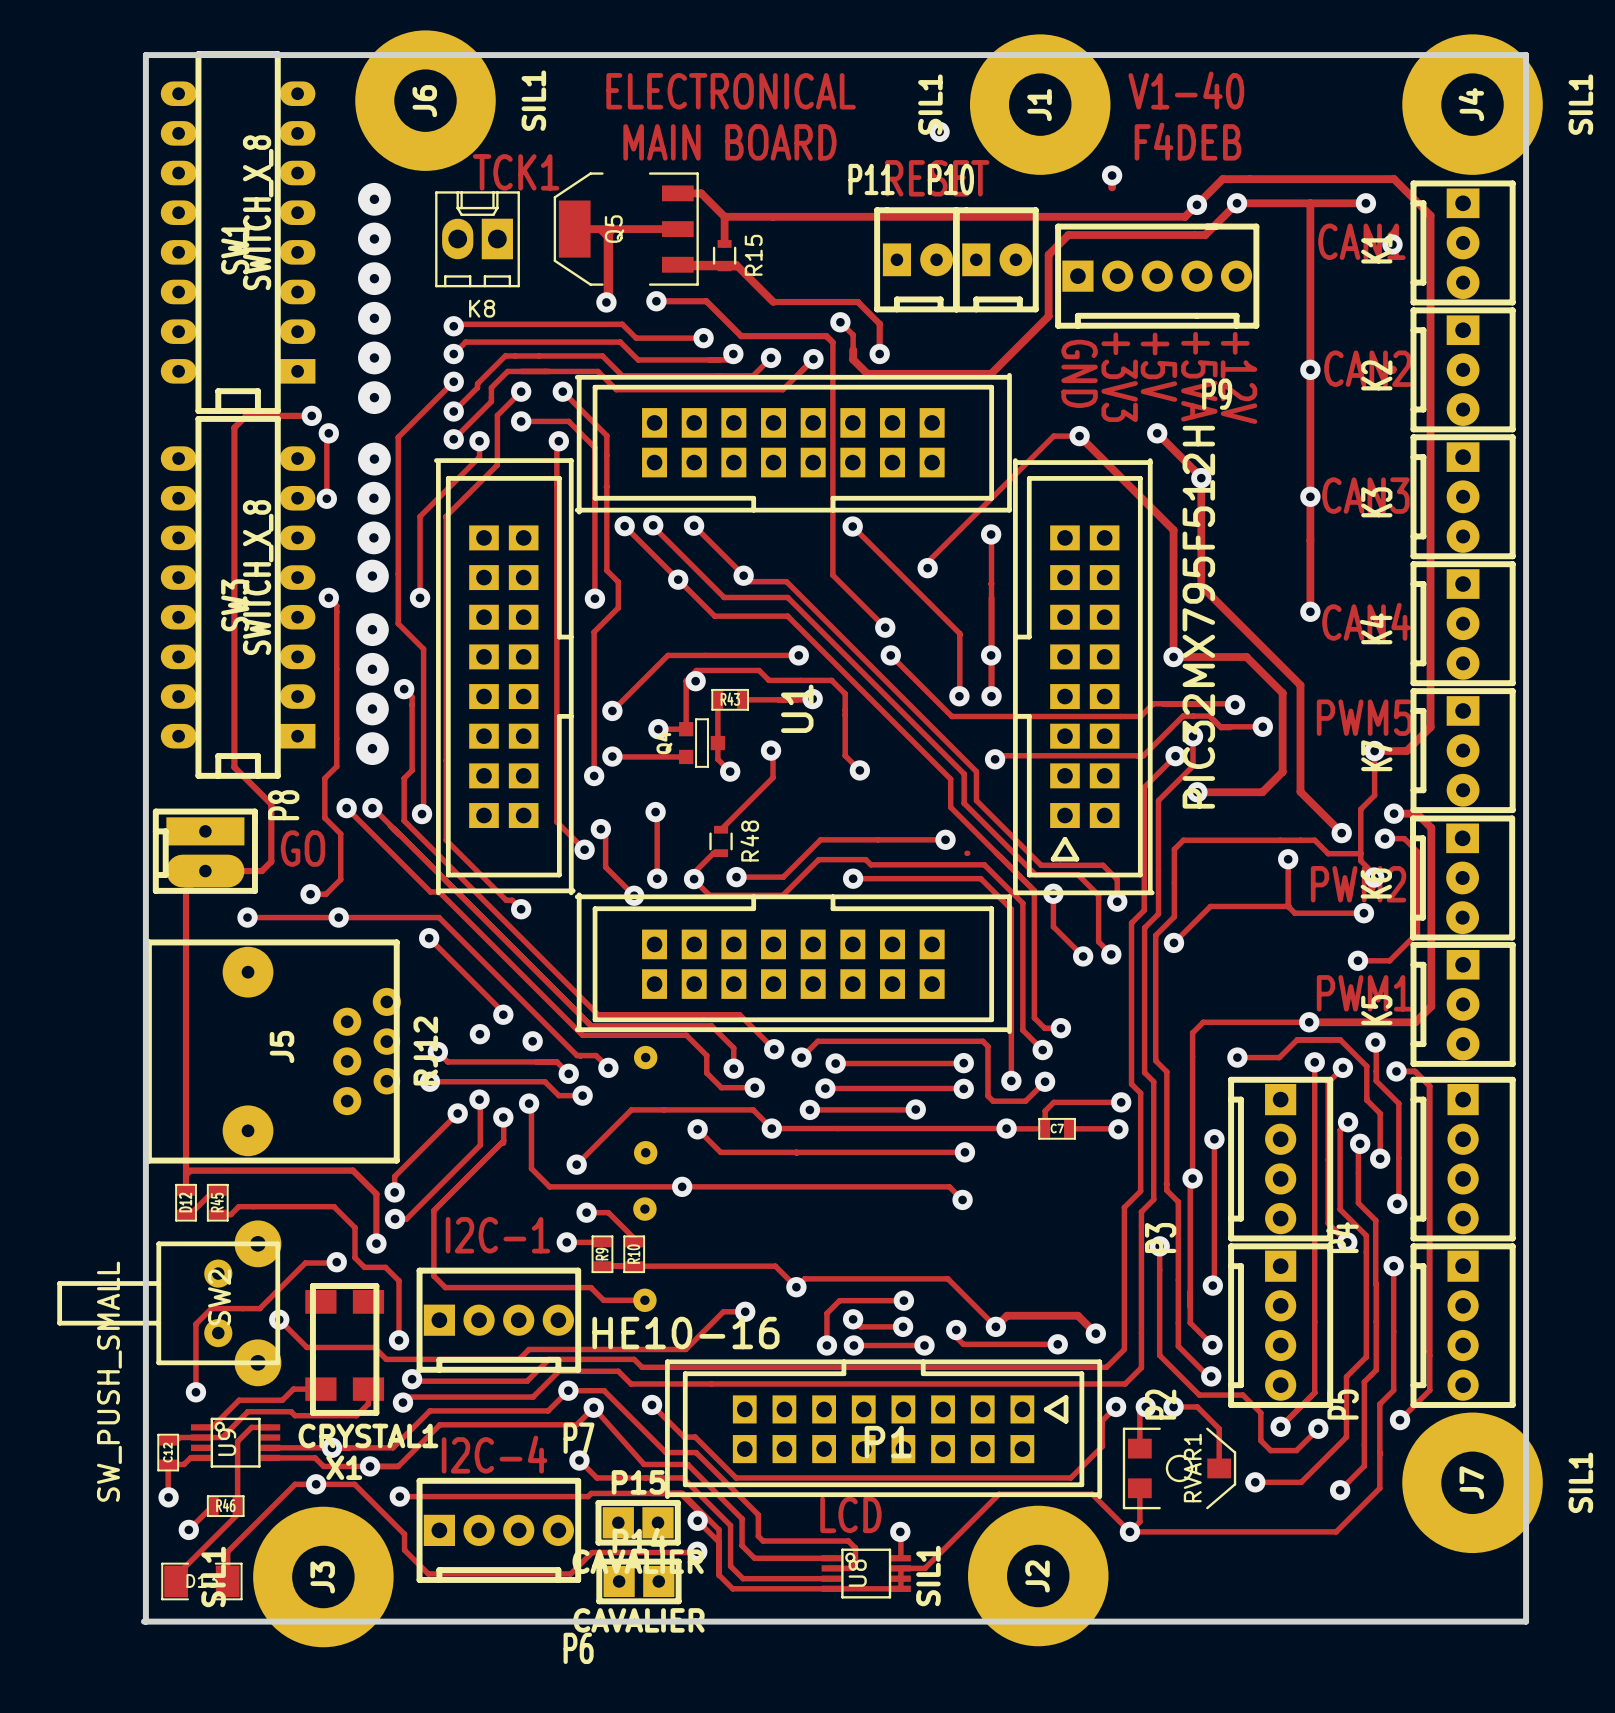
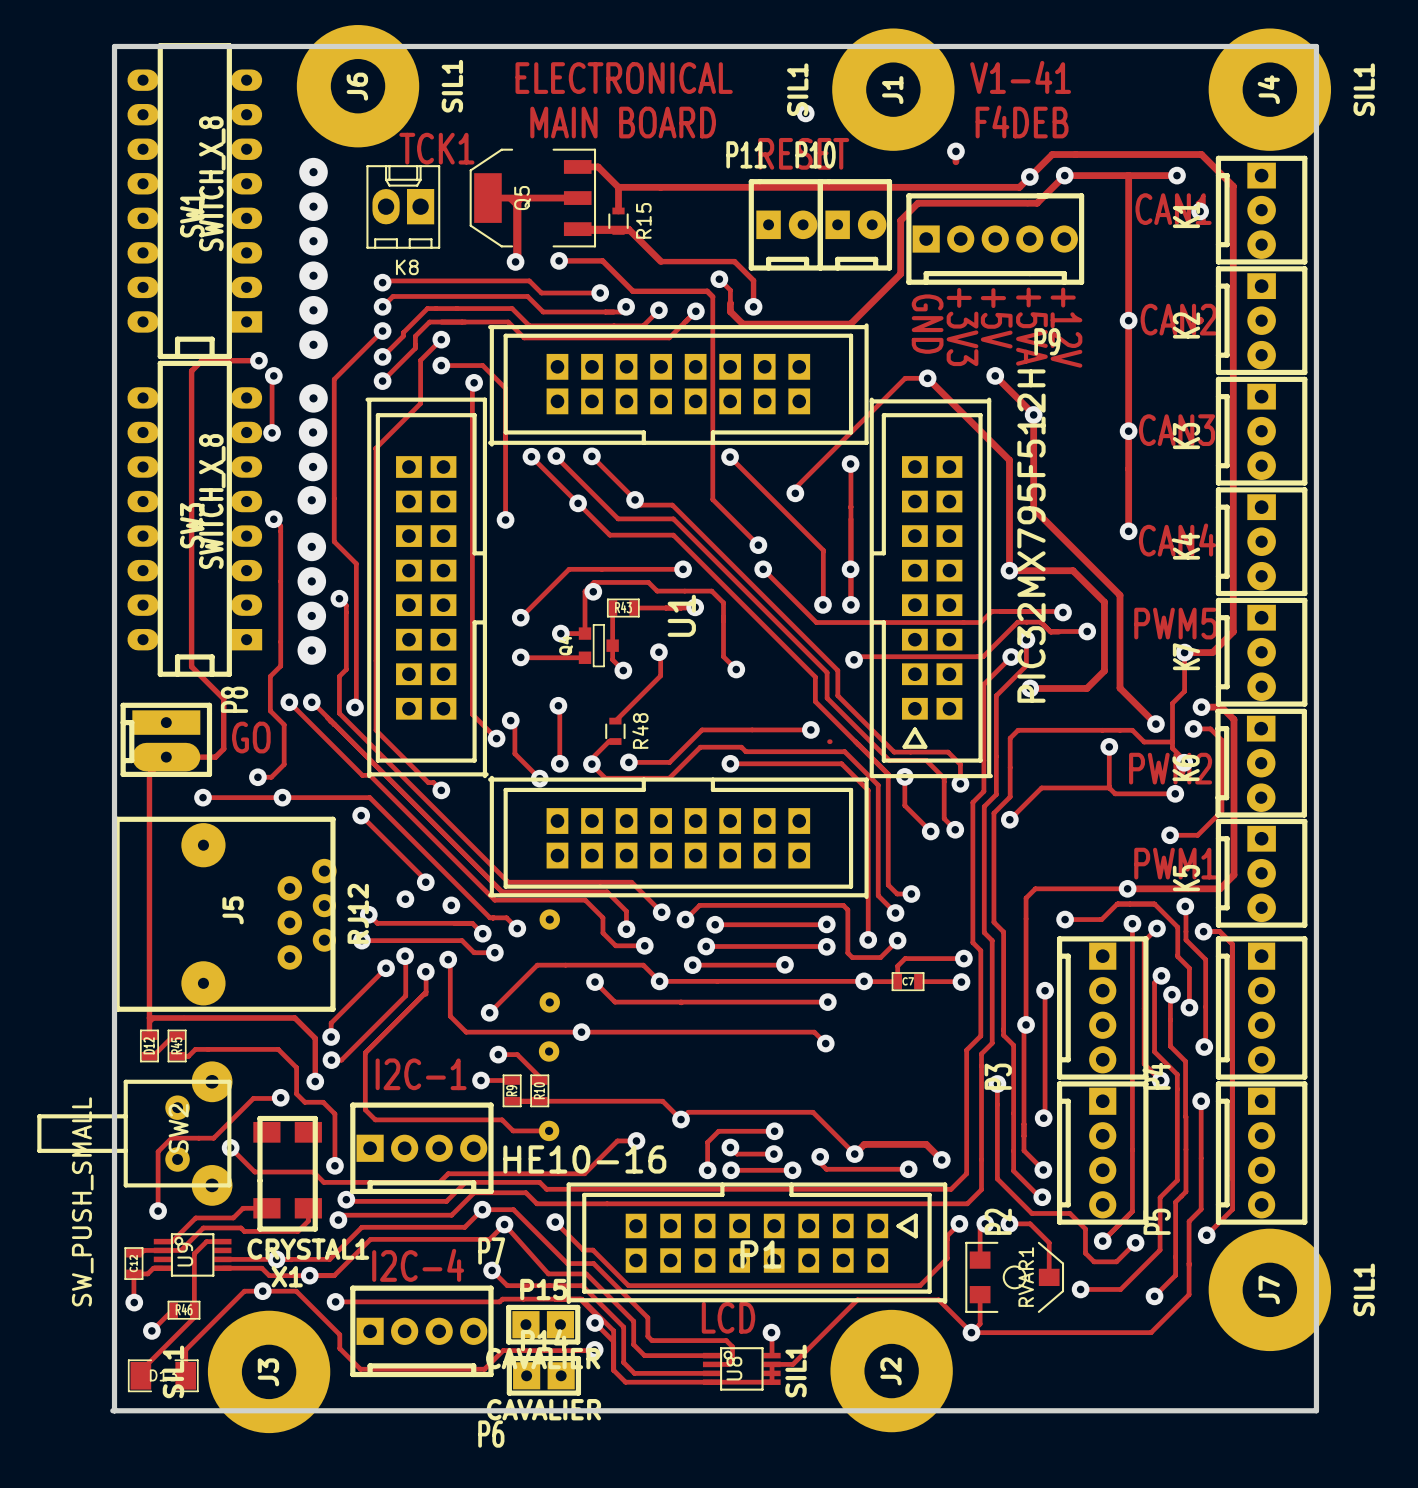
text: V1-40 (1186, 90) -> V1-41 (1020, 77)
track: (562, 391) (606, 435) (606, 570) (618, 582) (618, 607) (594, 632) (594, 775) -> none
via: (562, 391) -> none
track: (479, 441) (479, 457) (420, 516) (420, 597) -> none
via: (479, 441) -> none
via: (420, 597) -> none
via: (594, 775) -> none

